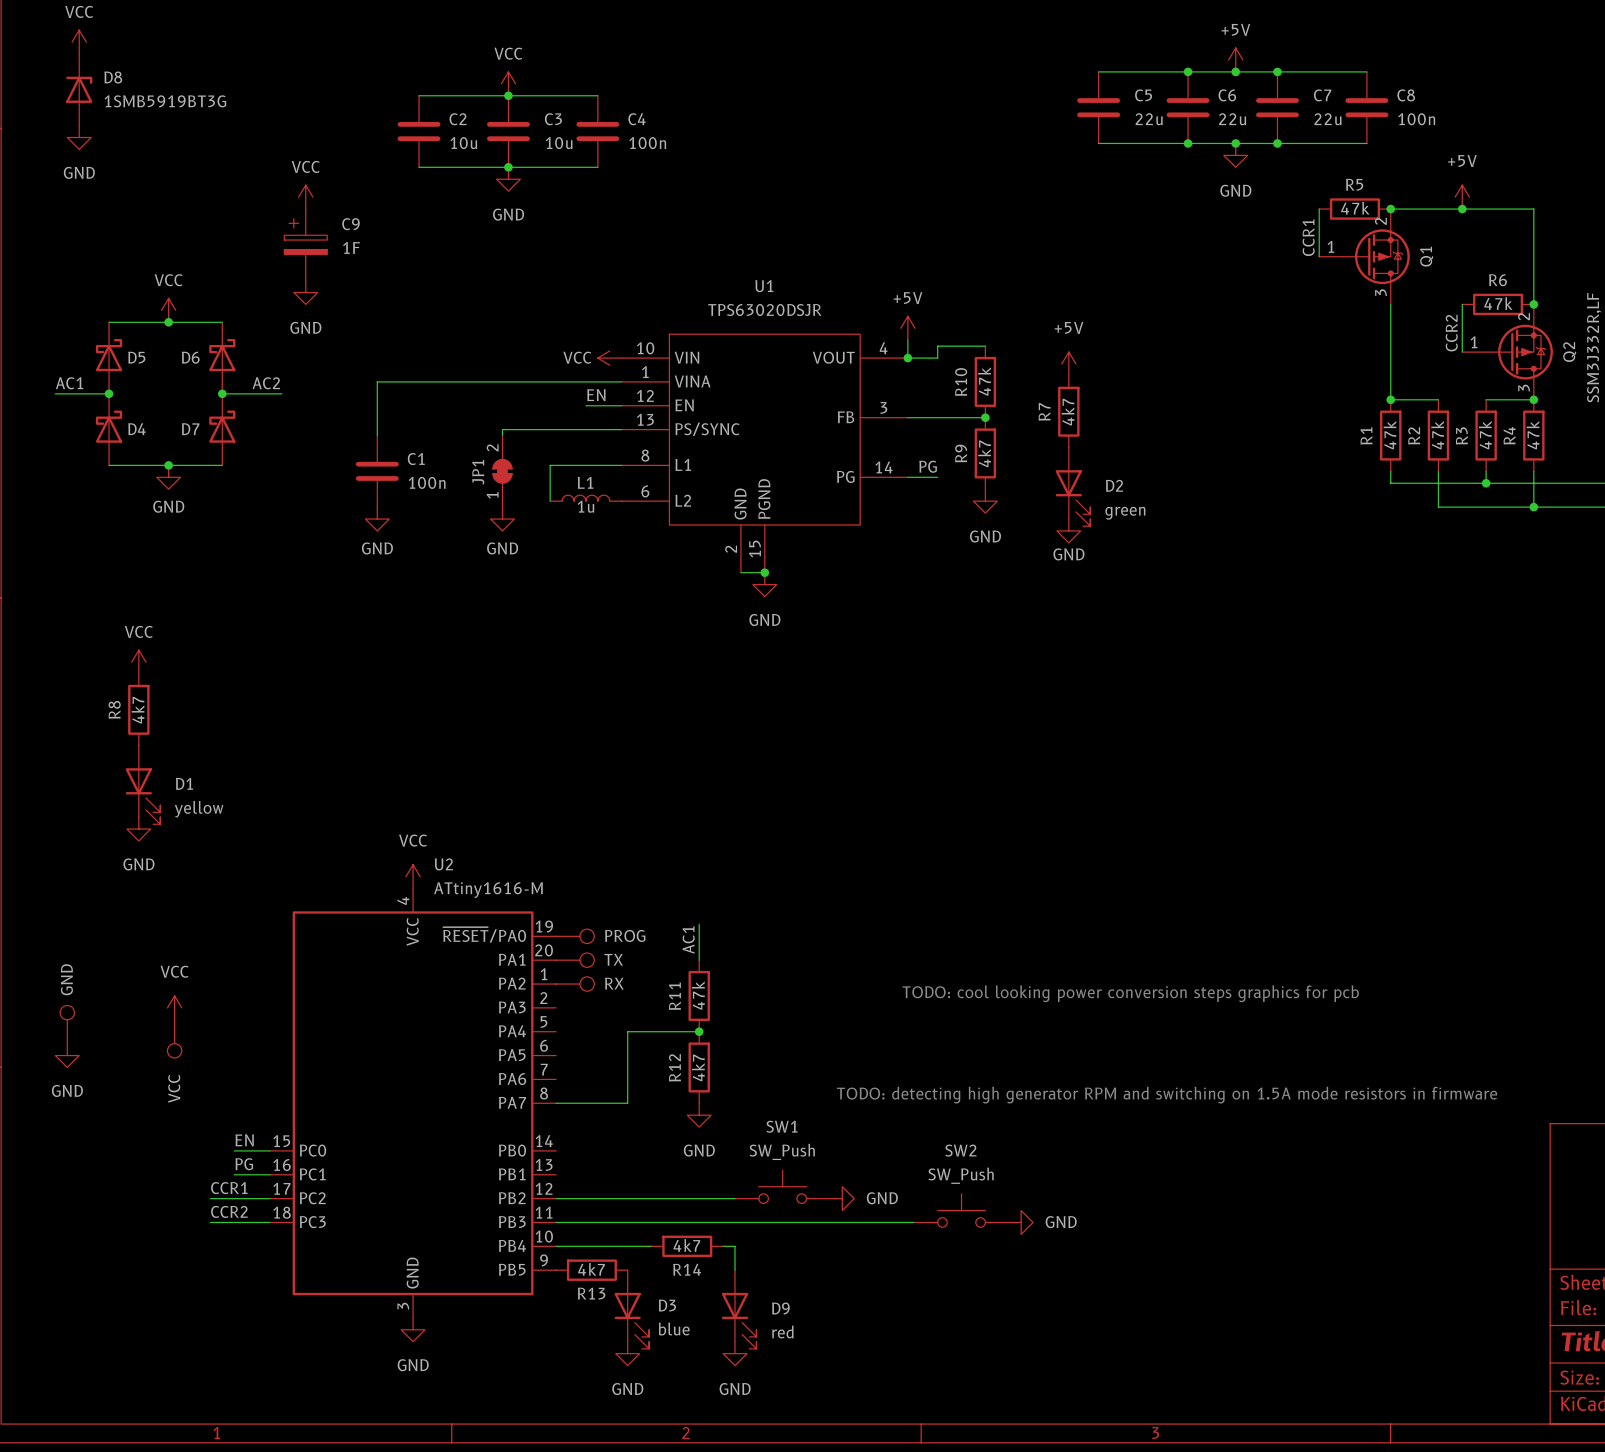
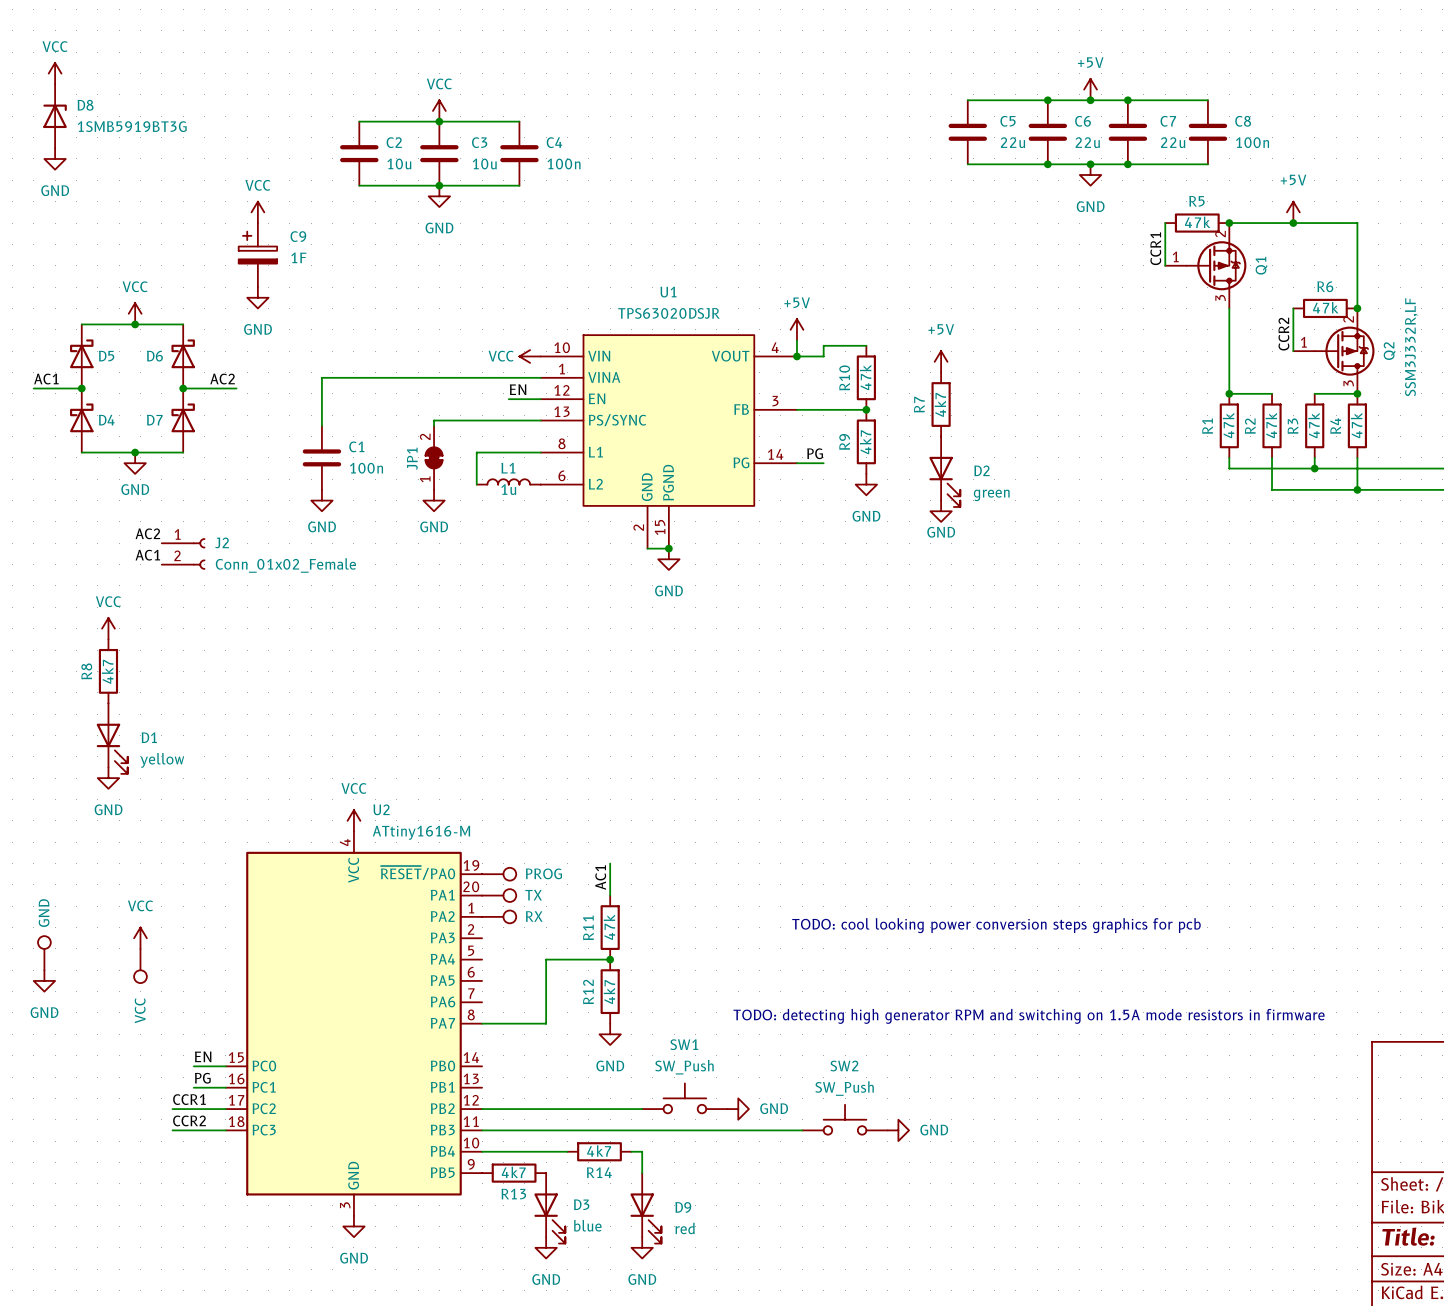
label: none -> AC2 (147, 533)
J2: none -> Conn_01x02_Female (183, 553)
label: none -> AC1 (147, 555)

